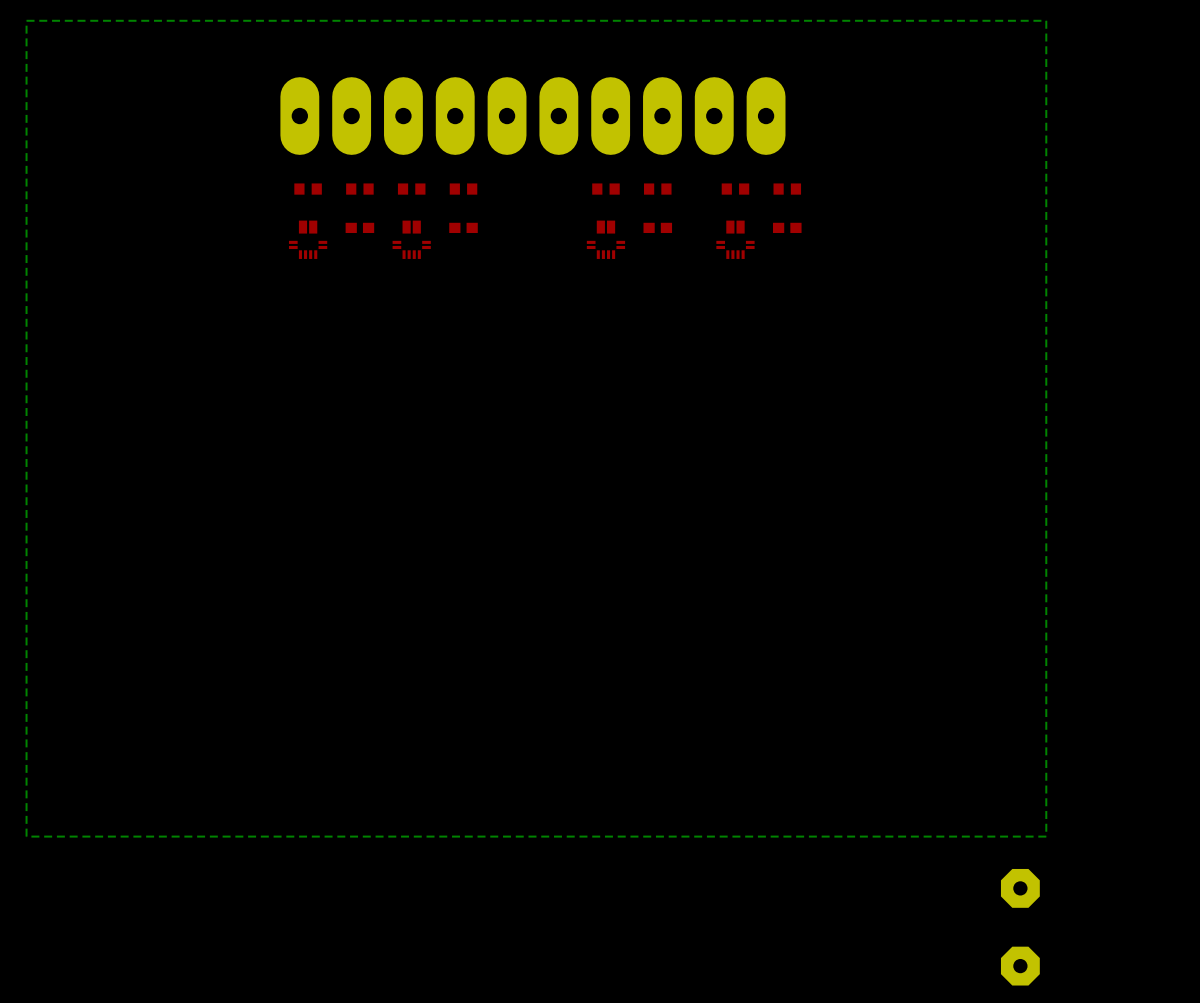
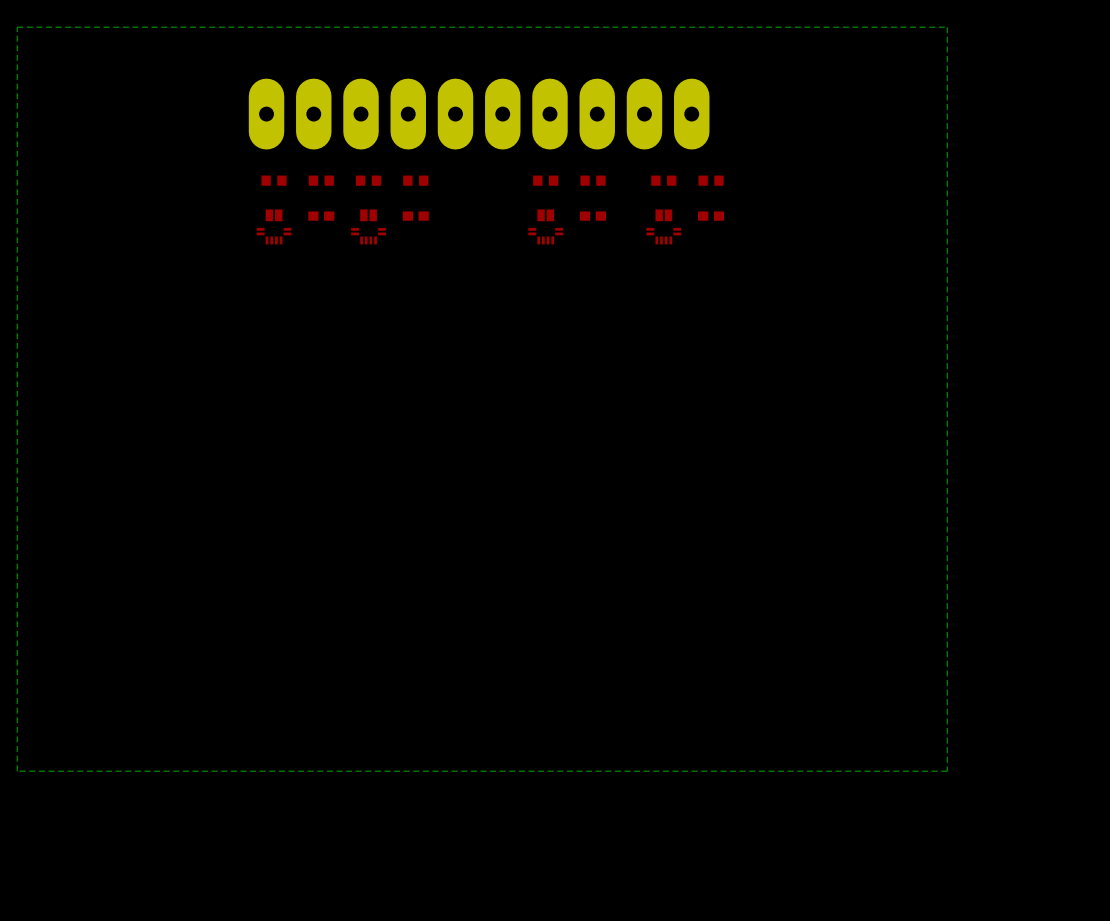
part: (1020, 888) -> none
part: (1020, 966) -> none

